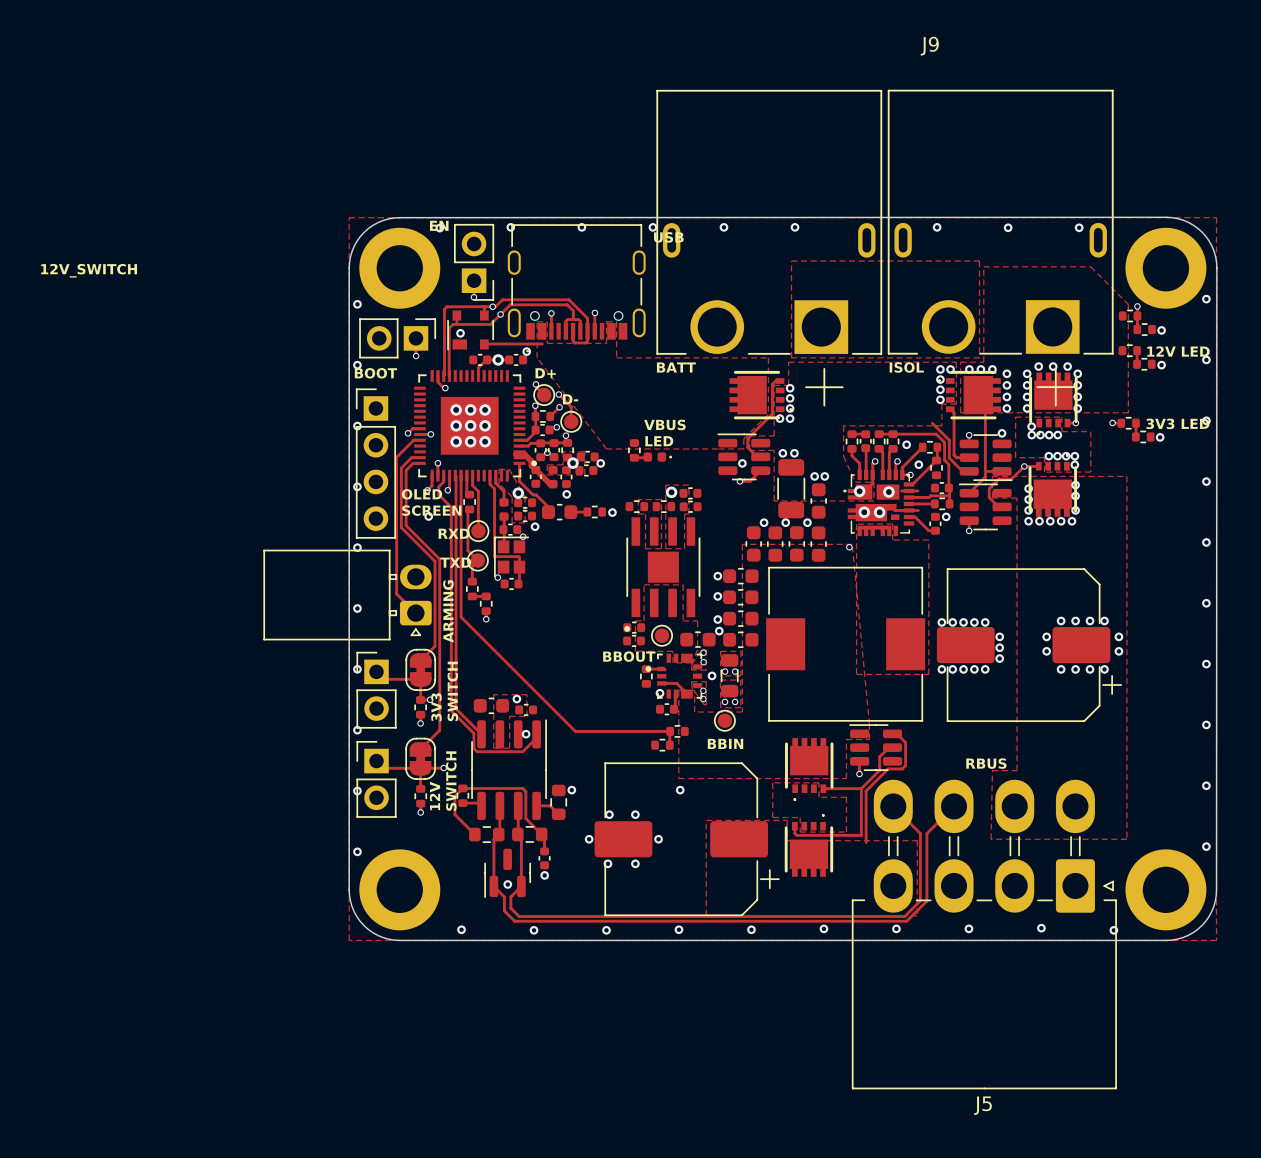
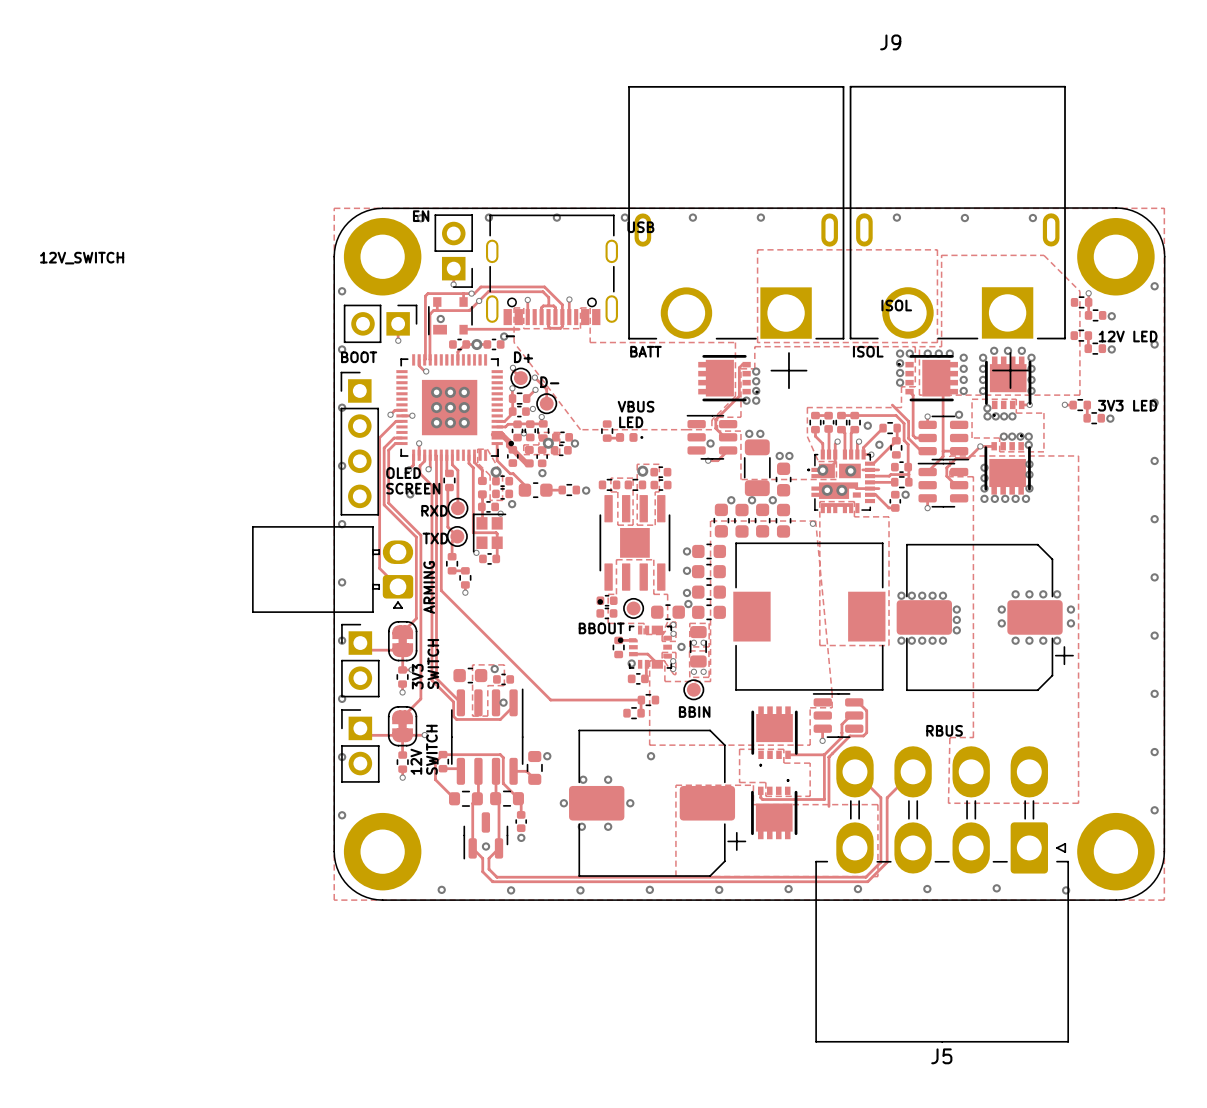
text: none -> ISOL (896, 305)

